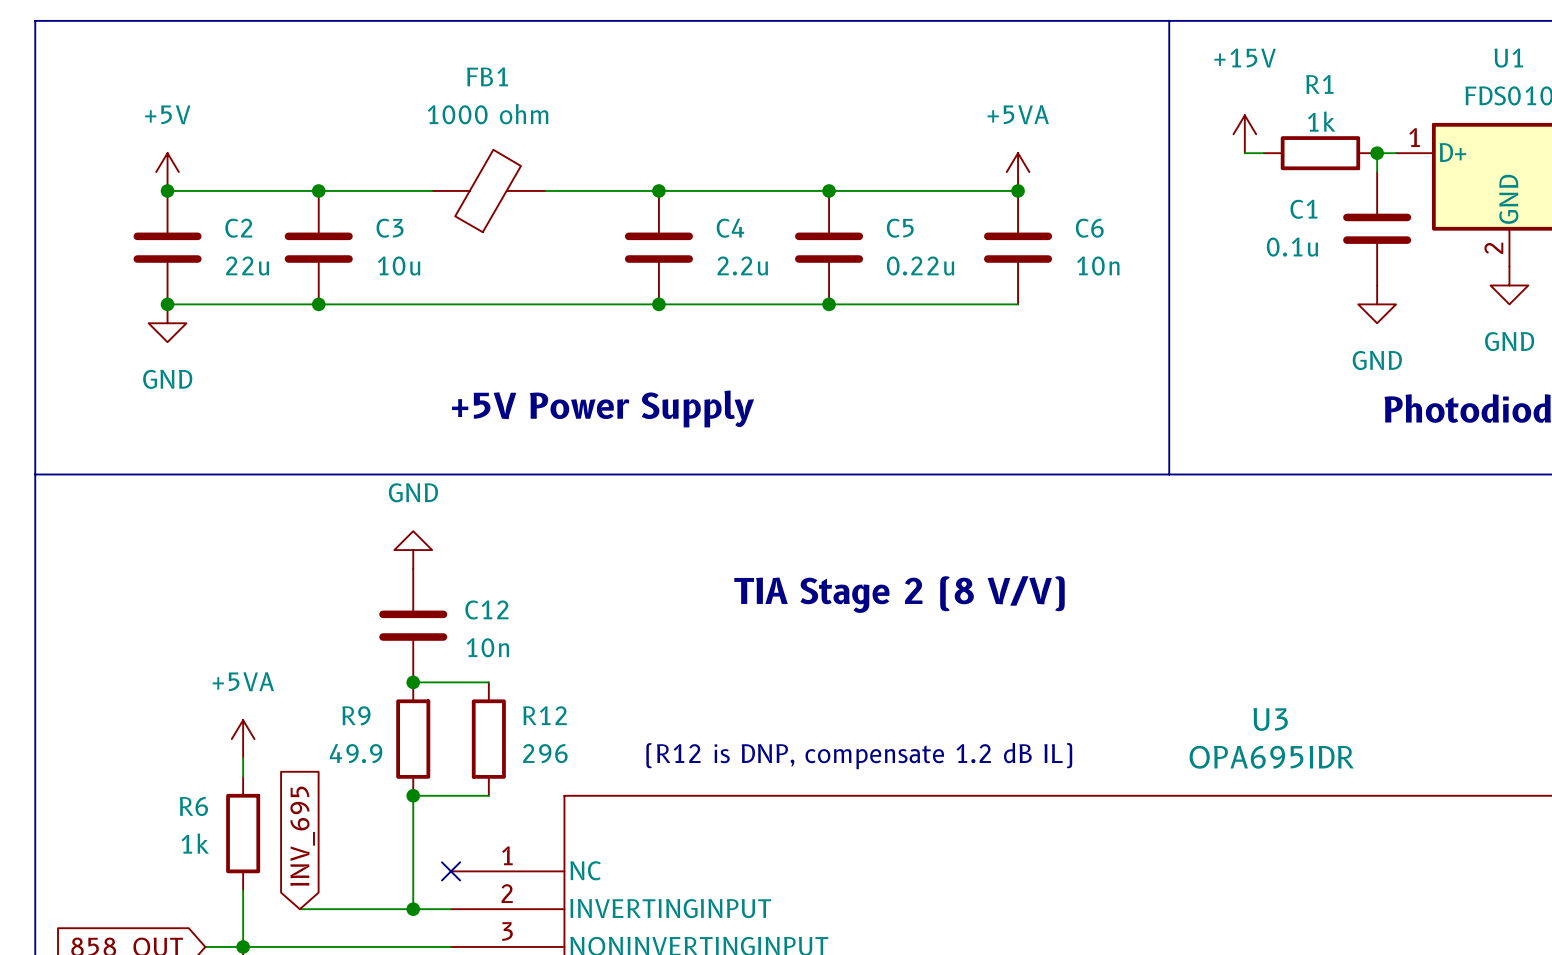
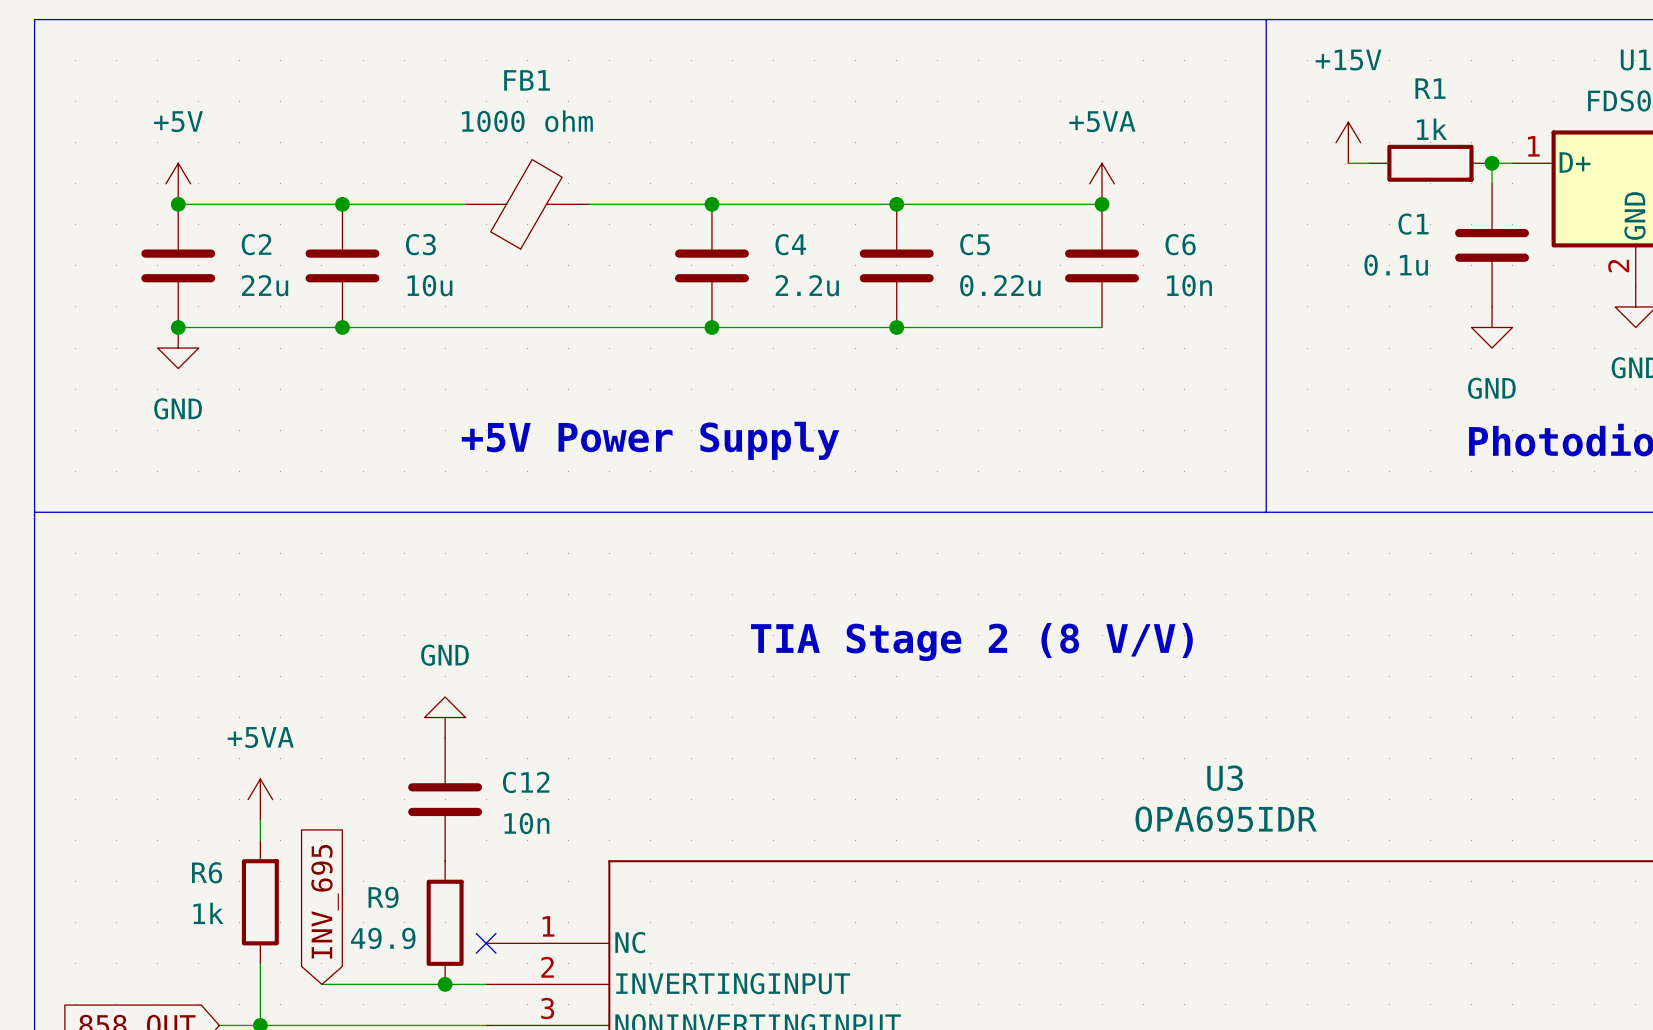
power symbol position: GND (413, 550) -> GND (445, 717)
C12 position: (413, 625) -> (445, 799)
wire: (413, 682) (488, 682) -> none
junction: (413, 682) -> none
U3 name position: U3 (1270, 719) -> U3 (1225, 778)
R9 position: (413, 739) -> (445, 922)
R12: 296 (488, 739) -> none
text: (R12 is DNP, compensate 1.2 dB IL) (859, 756) -> none
U3 value position: OPA695IDR (1271, 757) -> OPA695IDR (1226, 819)
junction: (413, 795) -> none
wire: (488, 795) (413, 795) (413, 909) -> none

